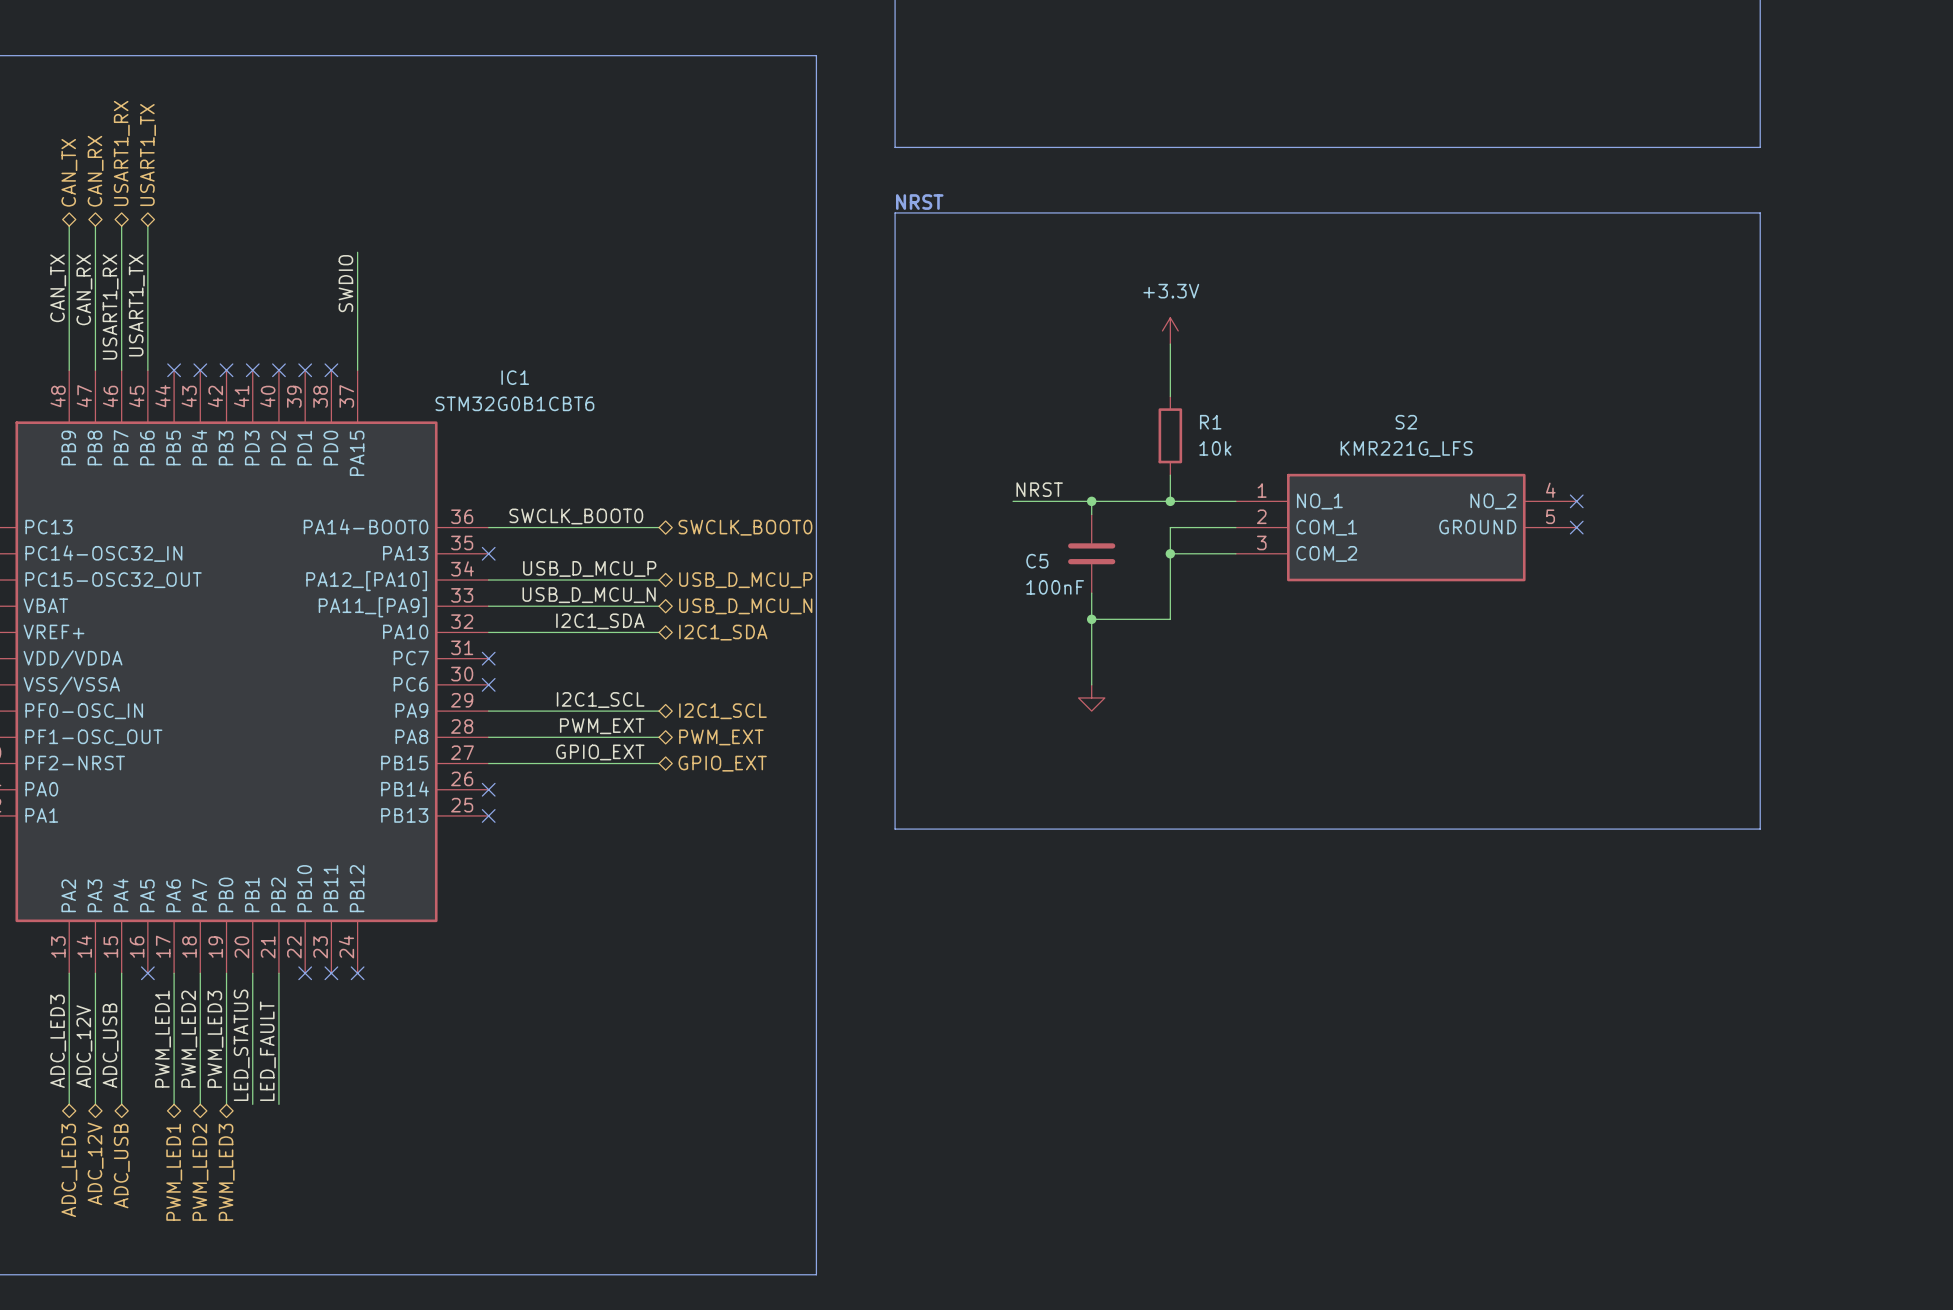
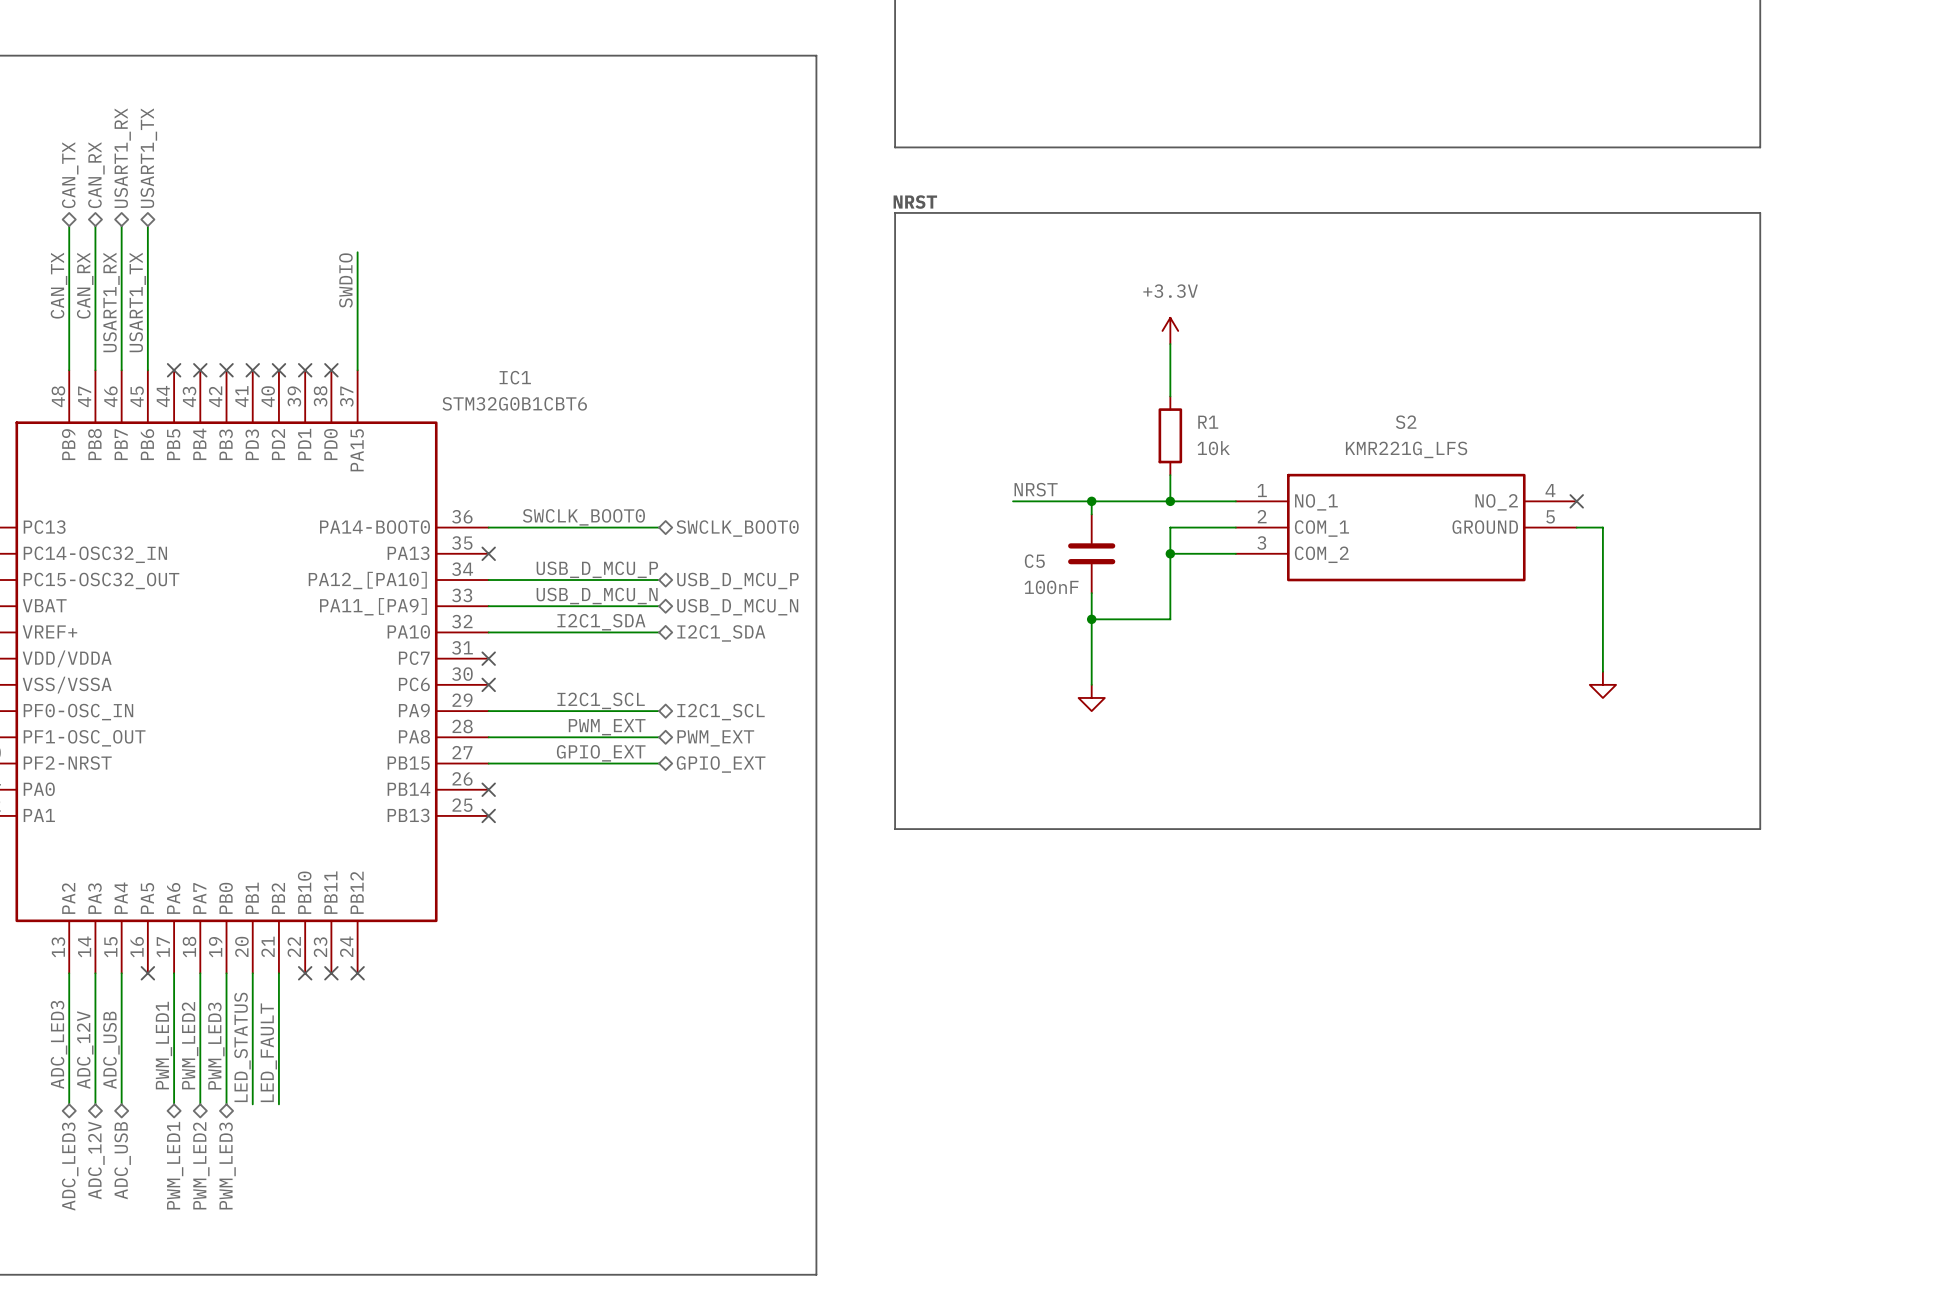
wire: none -> (1576, 527) (1602, 527) (1602, 671)
no-connect mark: (1576, 527) -> none
power symbol: none -> (1602, 684)

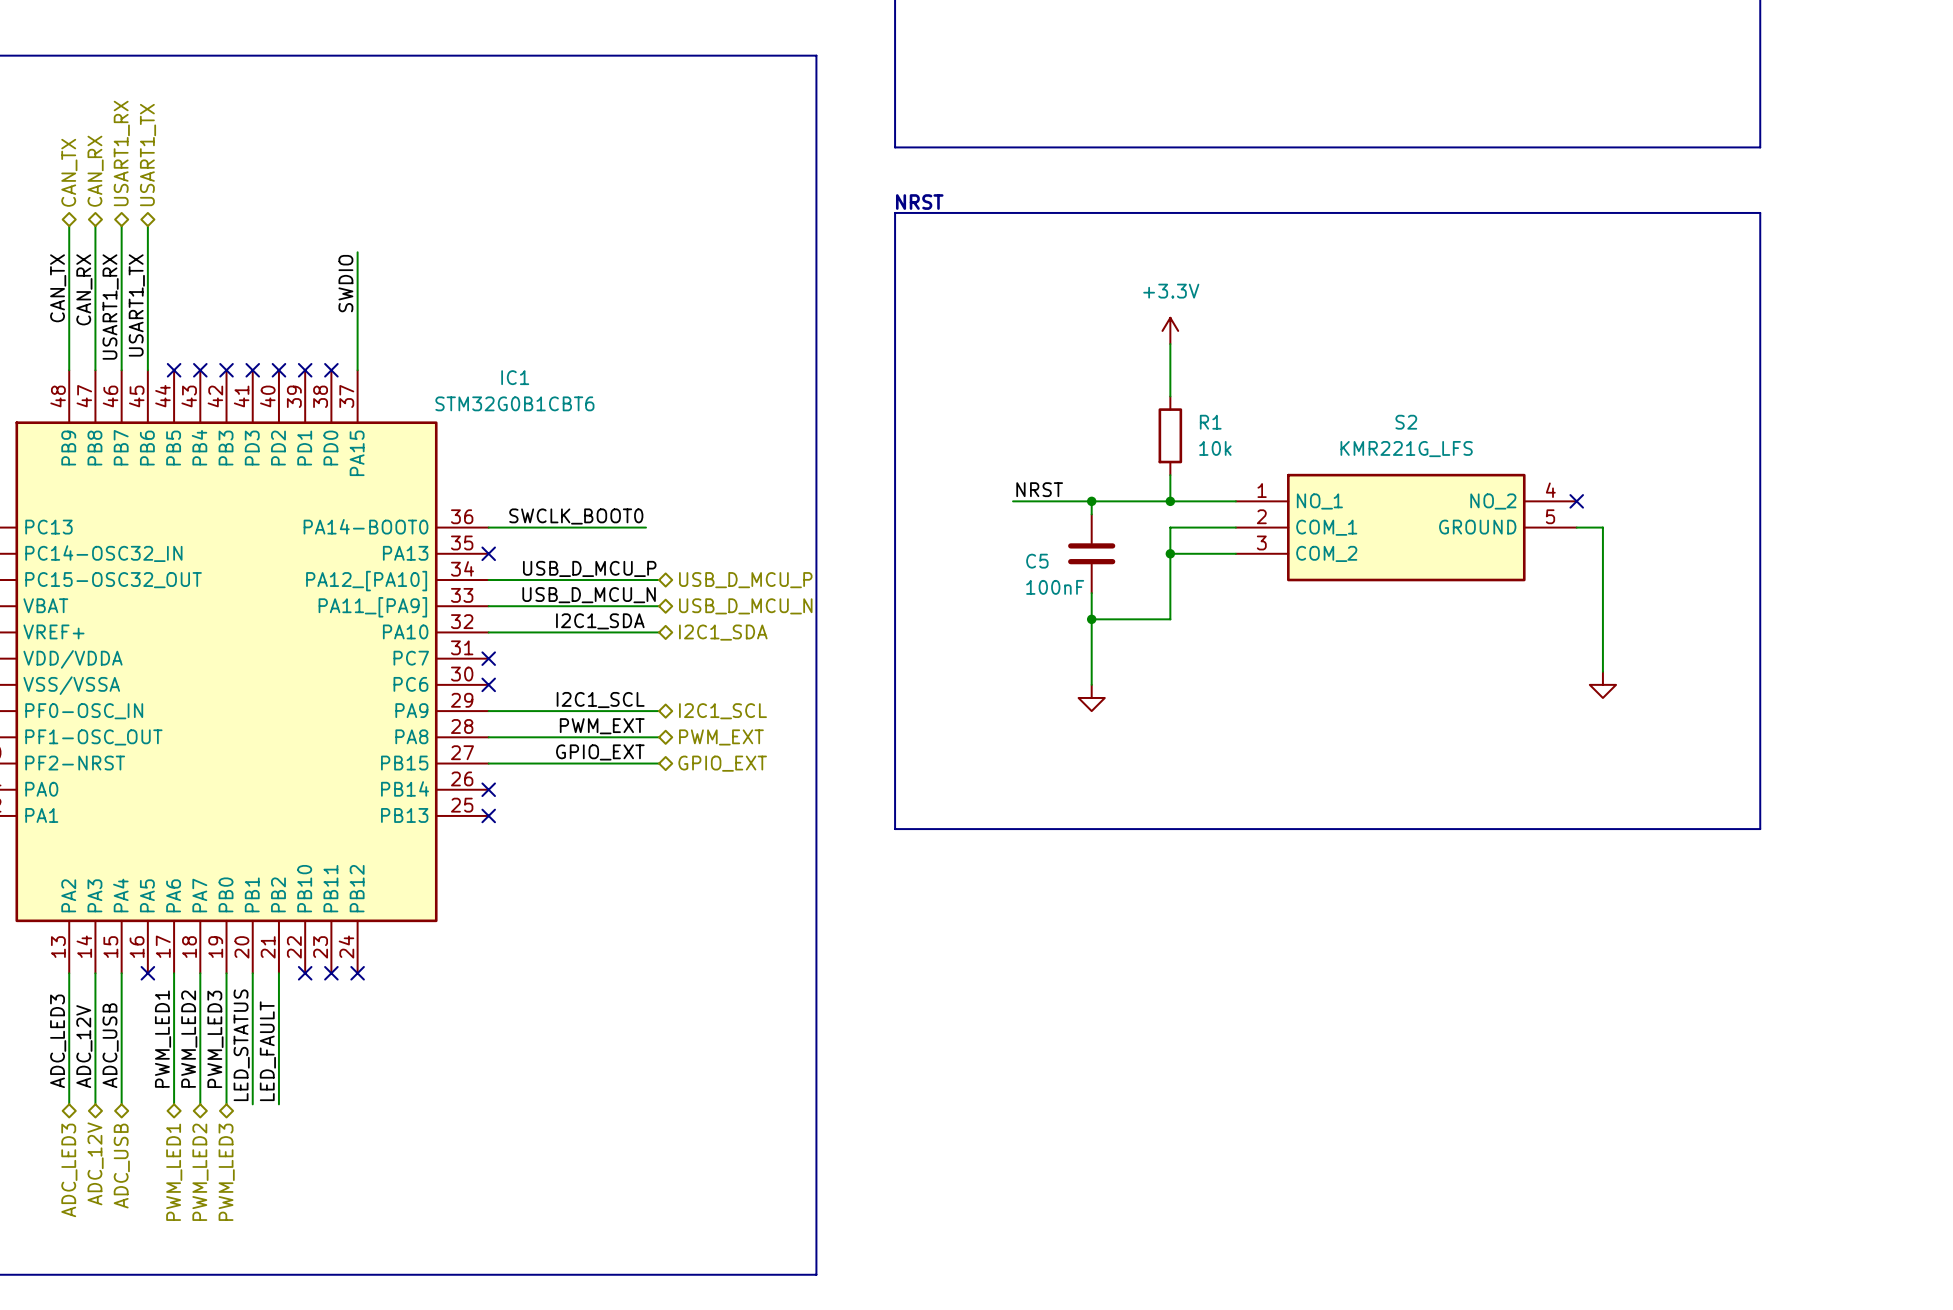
wire: (646, 527) (659, 527) -> none
hierarchical label: SWCLK_BOOT0 (737, 528) -> none

